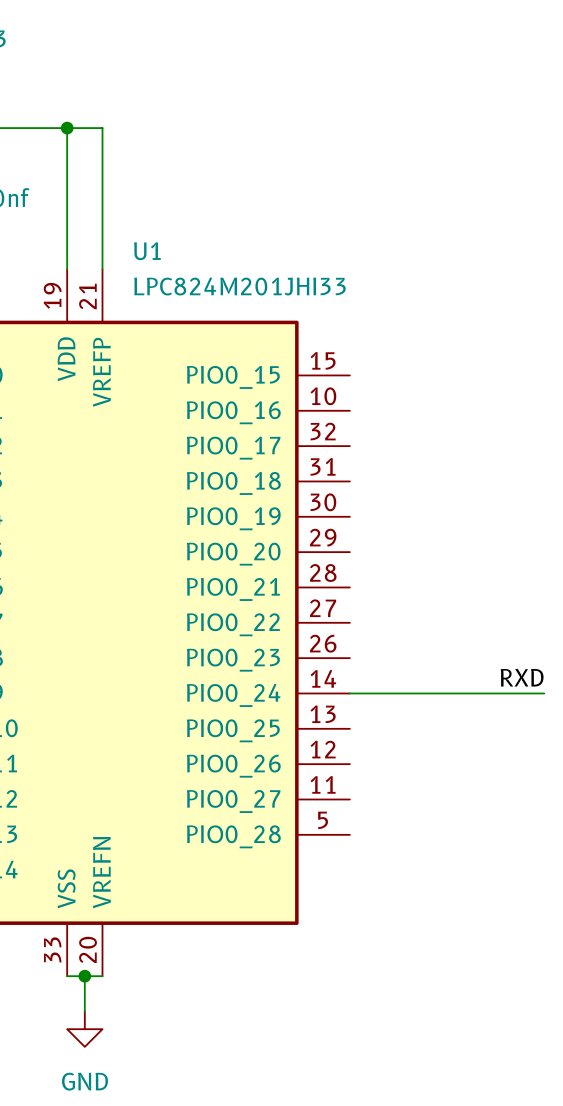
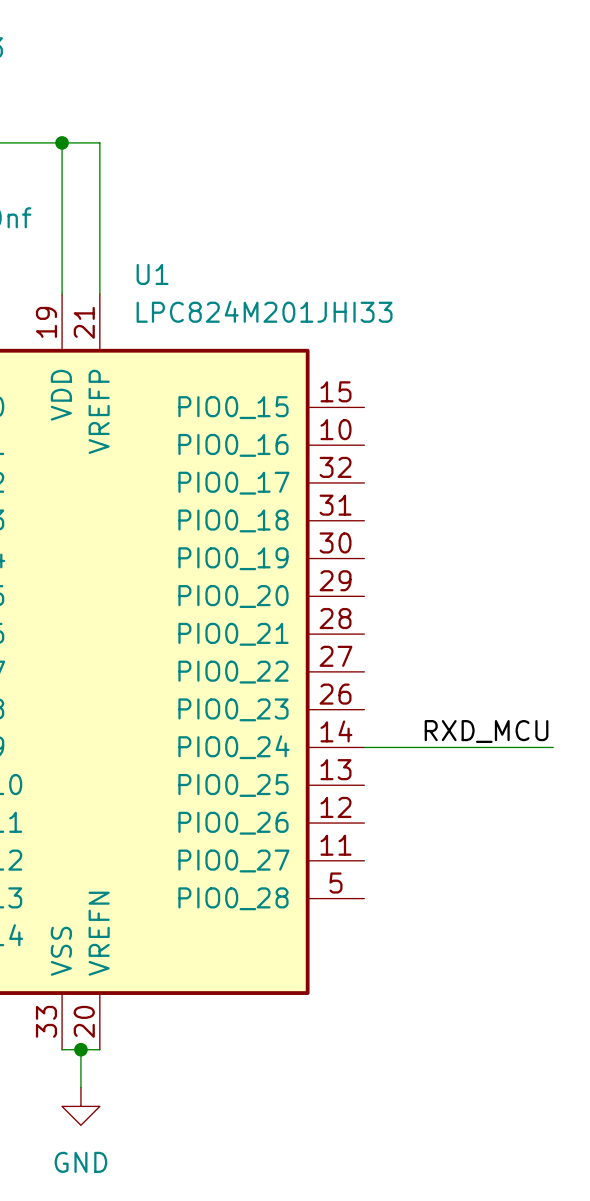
label: RXD (522, 677) -> none
label: none -> RXD_MCU (486, 731)
wire: (526, 693) (544, 693) -> none

